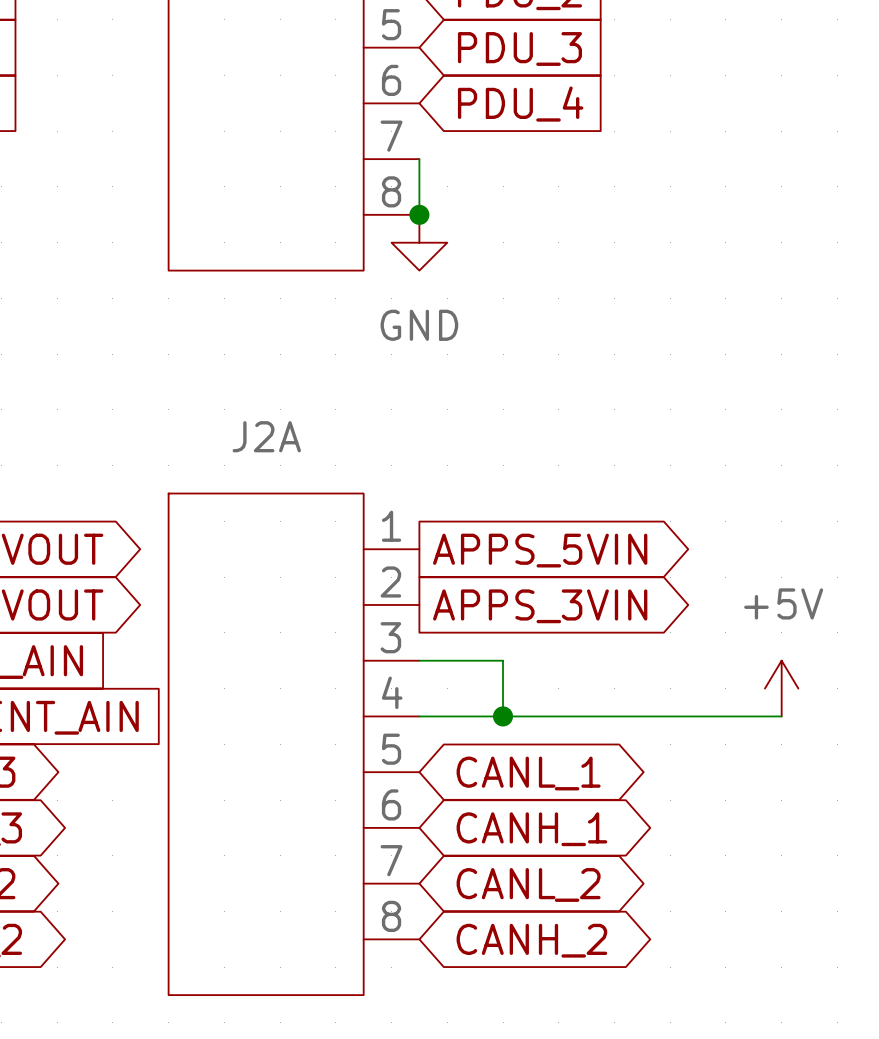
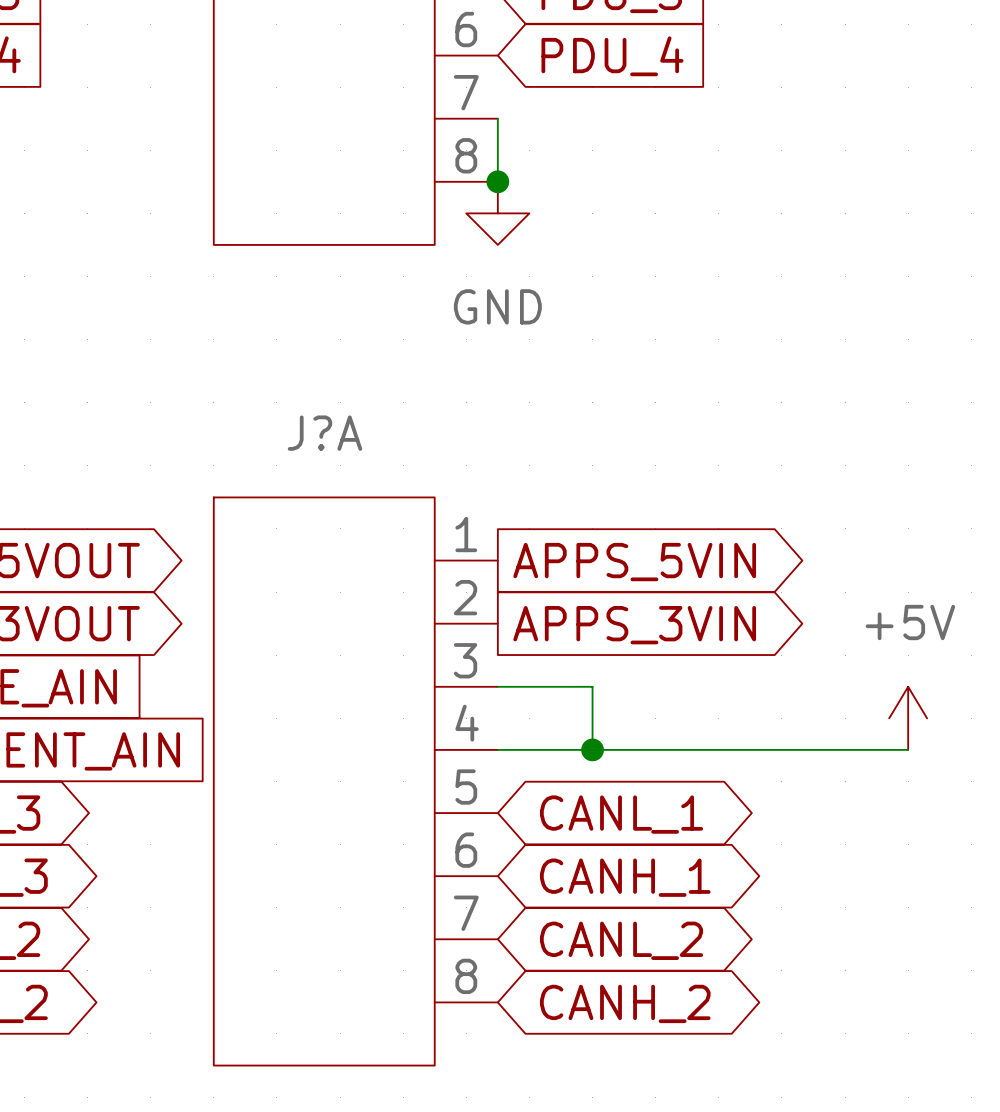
J2A name: J2A (266, 436) -> J?A (325, 433)

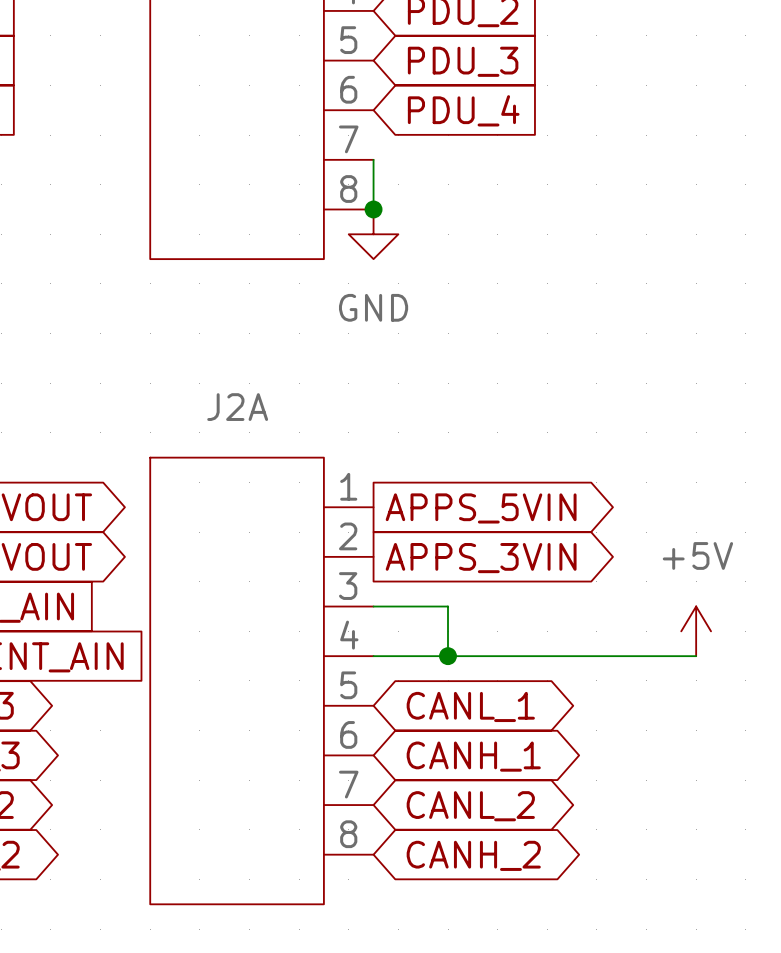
J?A name: J?A (325, 433) -> J2A (237, 407)

